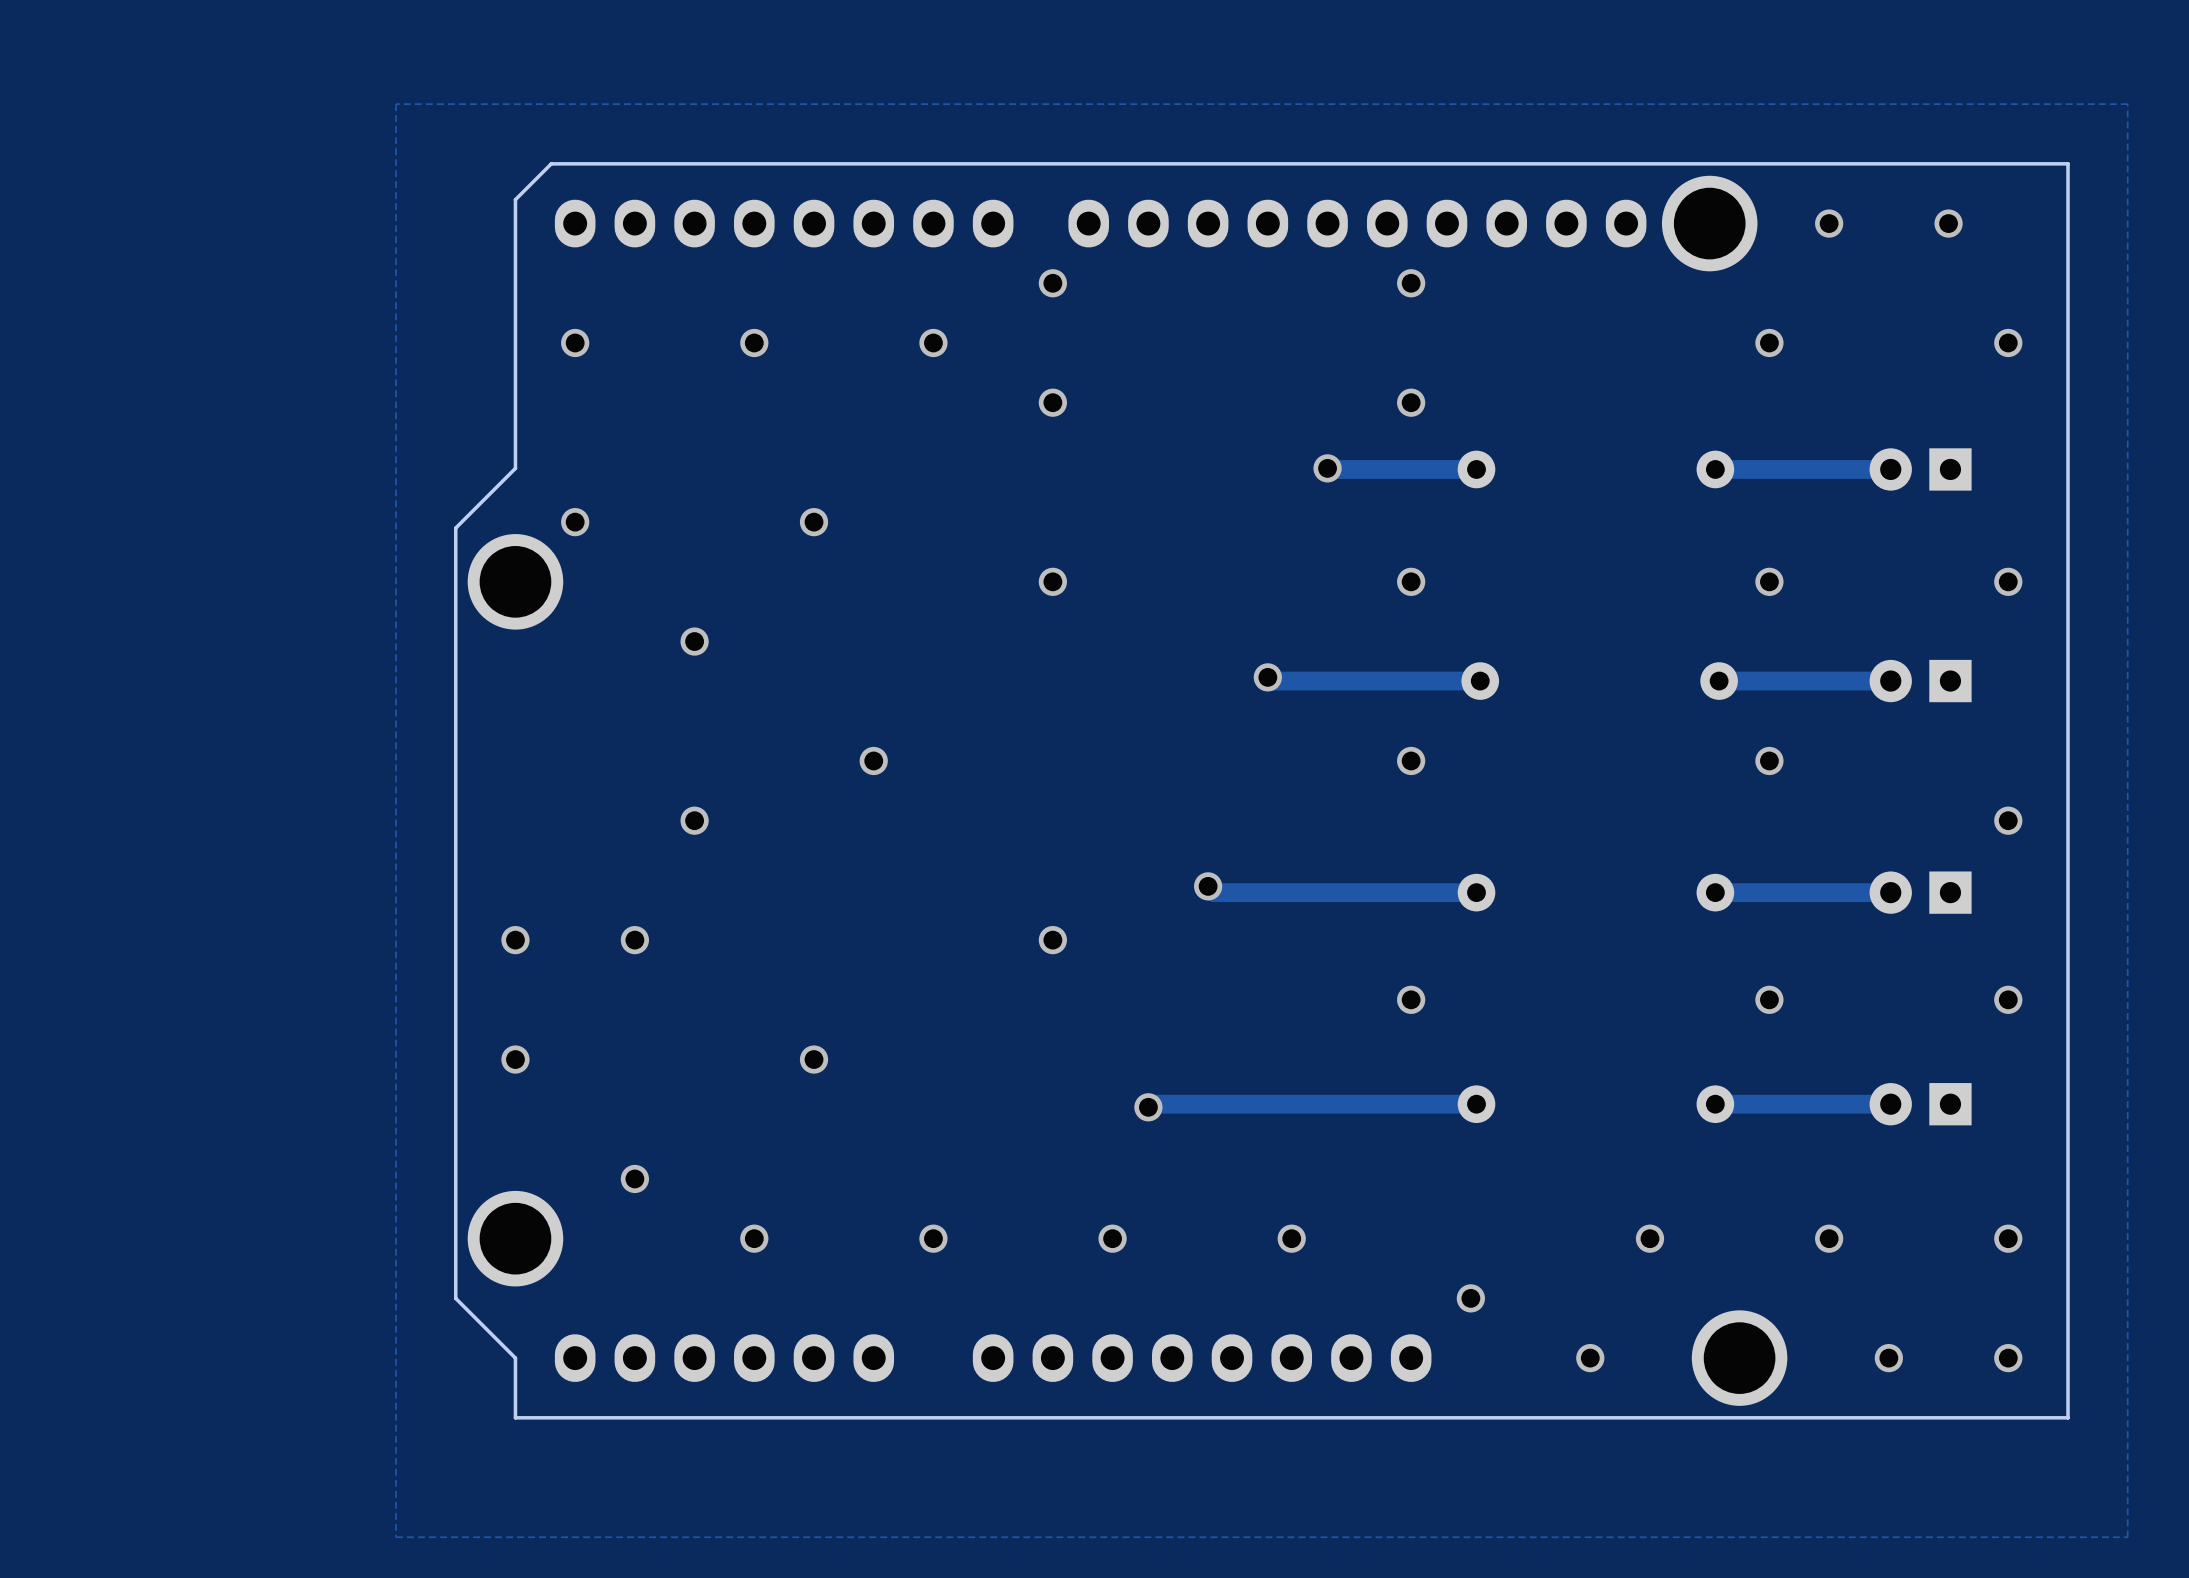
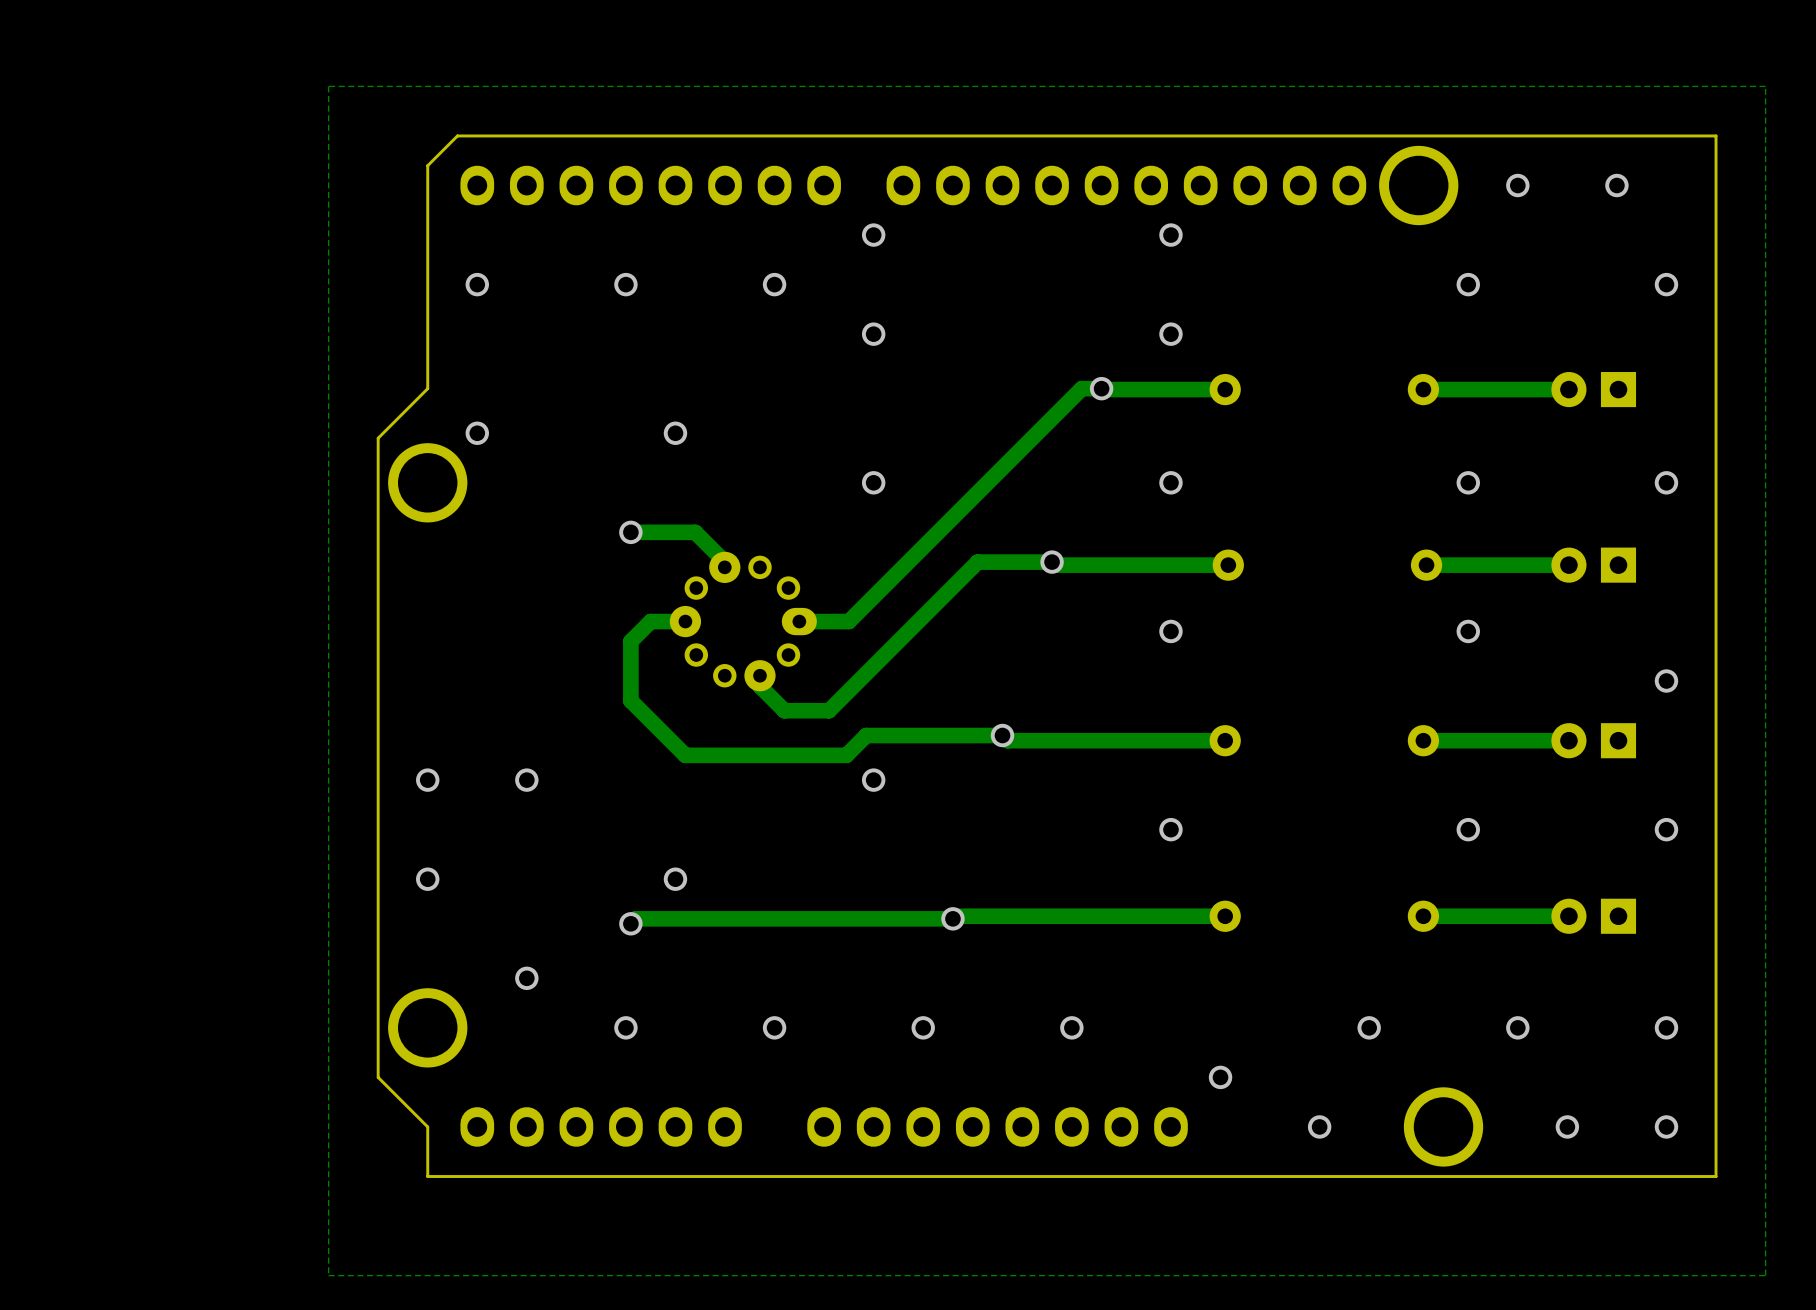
track: none -> (1101, 388) (1081, 388) (848, 621) (799, 621)
via position: (694, 641) -> (630, 532)
track: none -> (630, 532) (695, 532) (724, 561) (724, 567)
track: none -> (1052, 562) (977, 562) (829, 710) (784, 710) (759, 686) (759, 675)
track: none -> (685, 621) (650, 621) (630, 641) (630, 700) (685, 755) (846, 755) (866, 735) (1002, 735)
part: none -> (743, 621)
via: (873, 760) -> none
via: (694, 820) -> none
track: none -> (952, 918) (635, 918) (630, 923)
via: none -> (630, 923)

